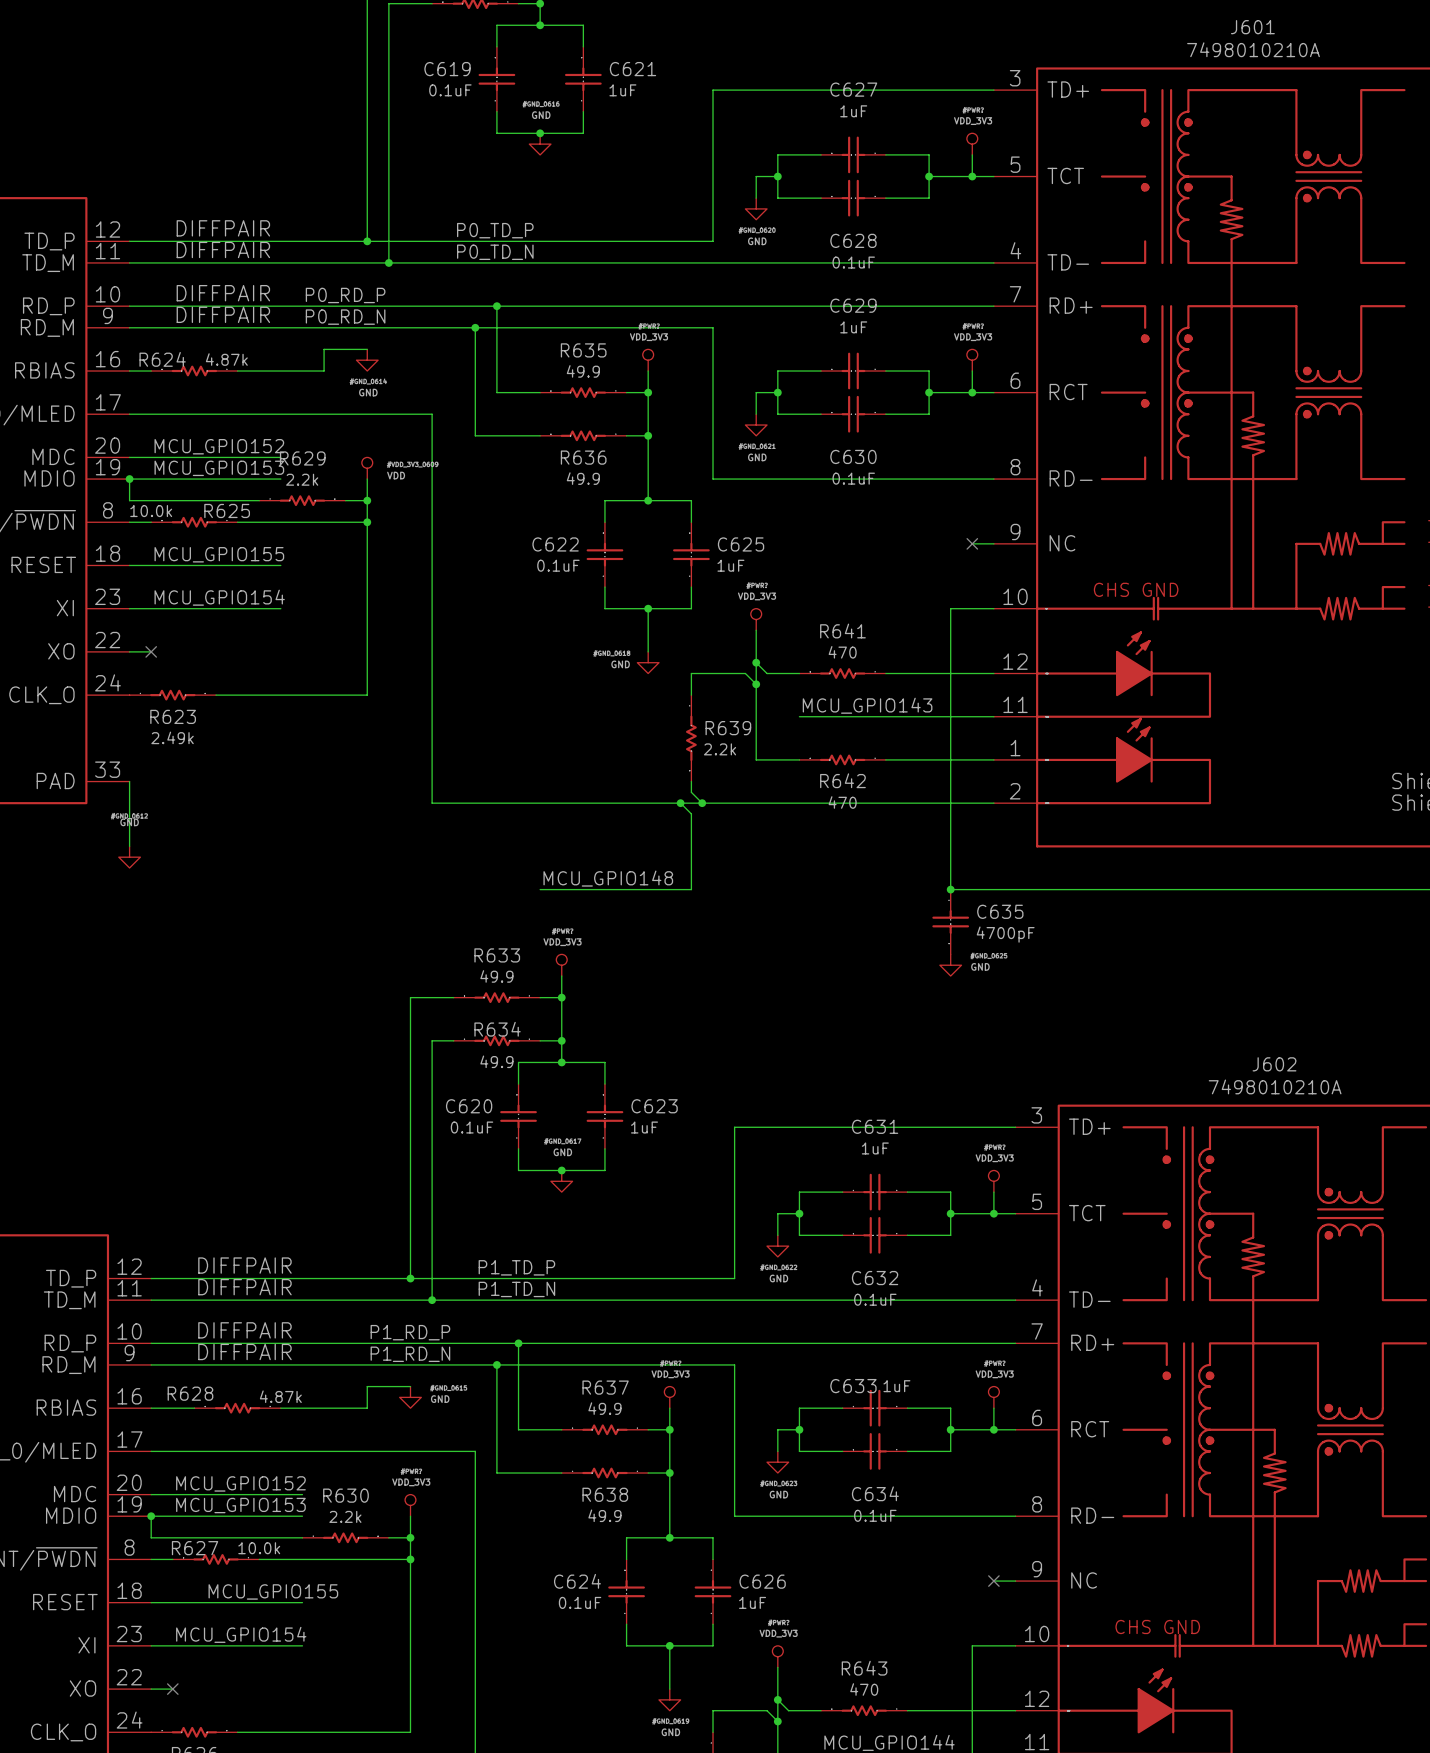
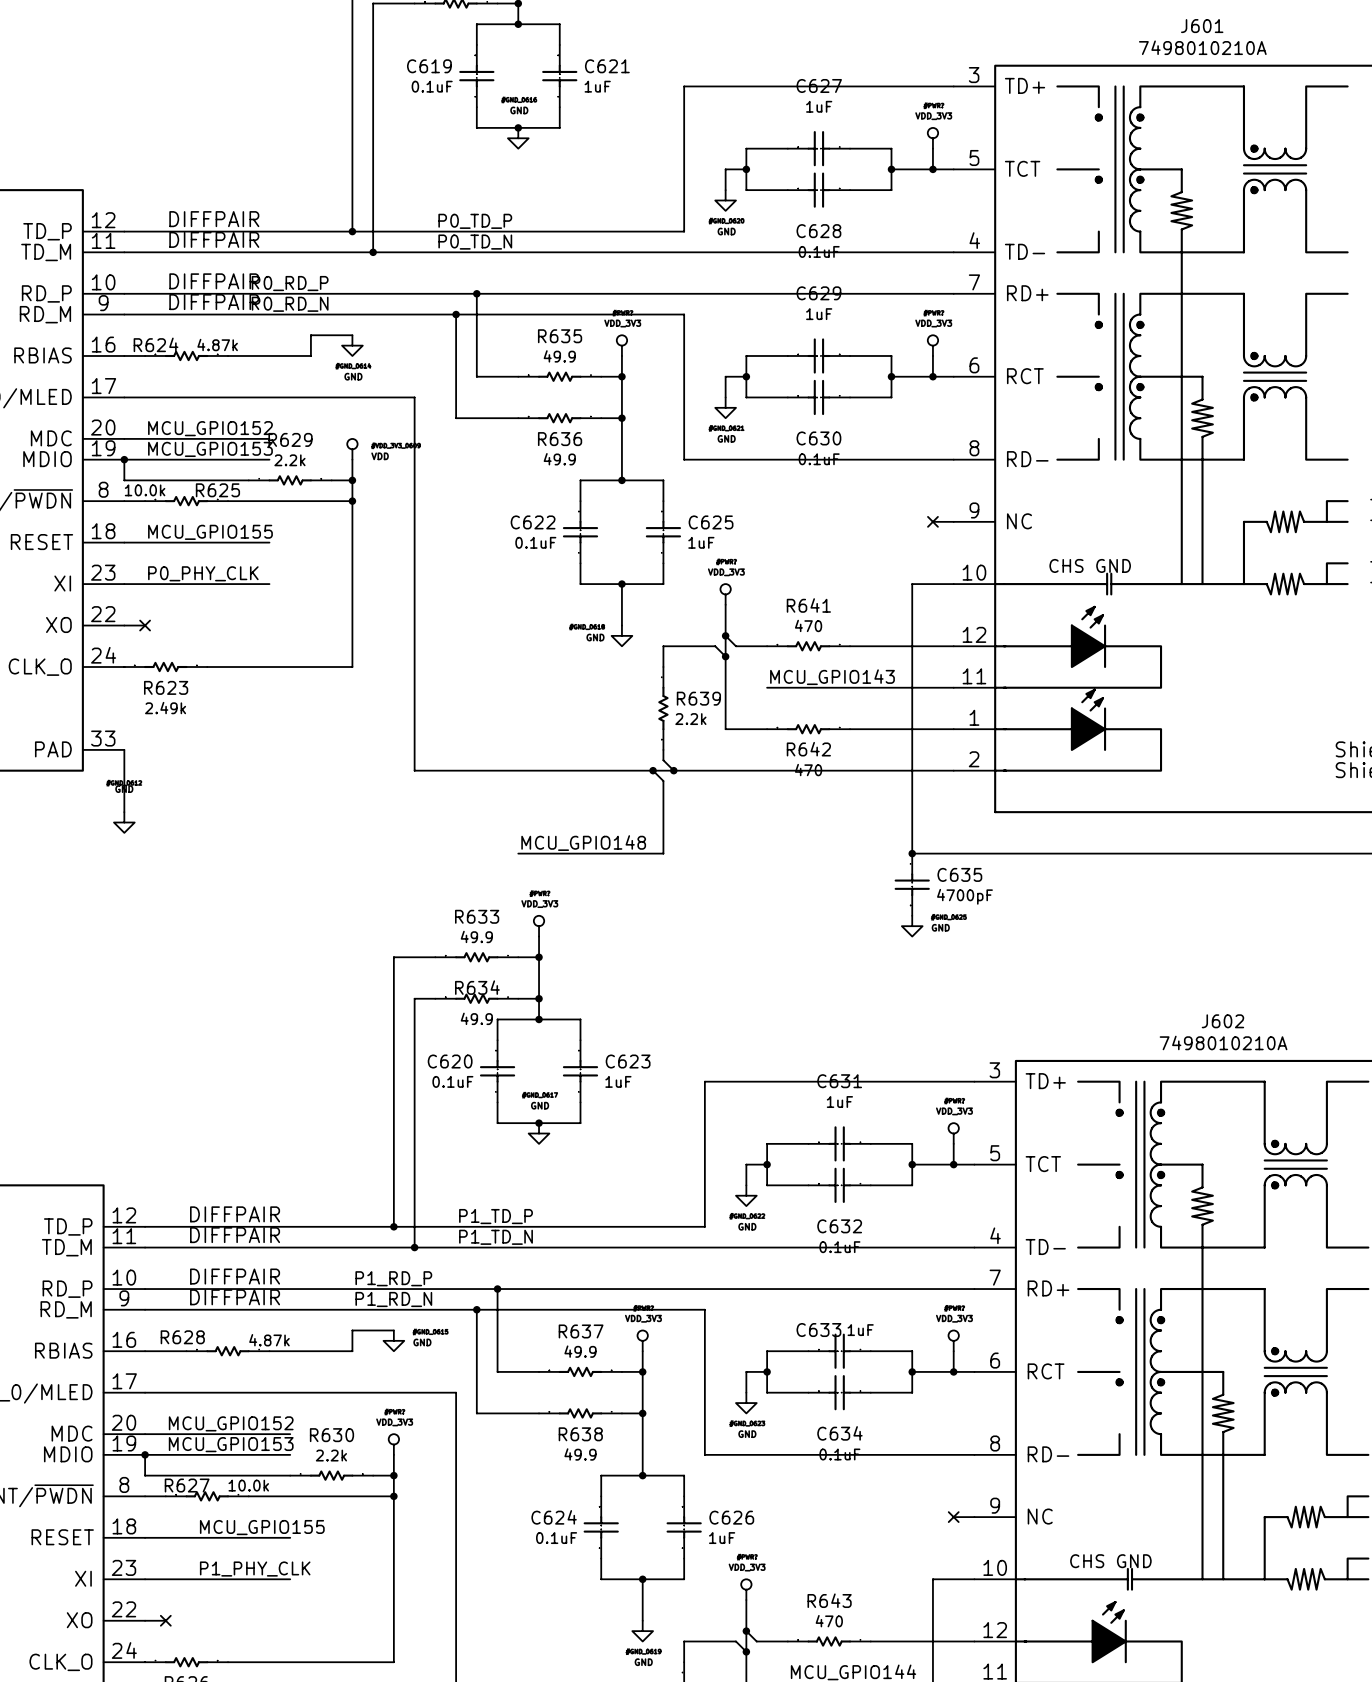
label position: P0_RD_P (345, 295) -> P0_RD_P (290, 283)
label position: P0_RD_N (345, 317) -> P0_RD_N (290, 304)
label: MCU_GPIO154 (219, 597) -> P0_PHY_CLK (203, 573)
label: MCU_GPIO154 (241, 1634) -> none
label: none -> P1_PHY_CLK (255, 1569)

